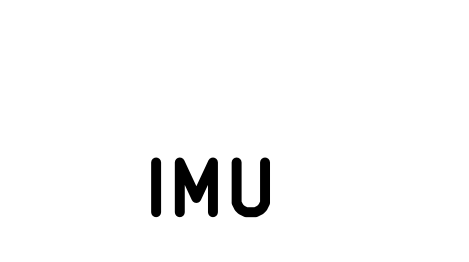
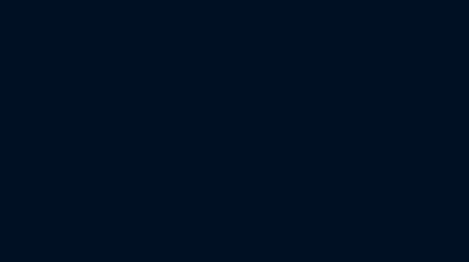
text: IMU (210, 187) -> none

